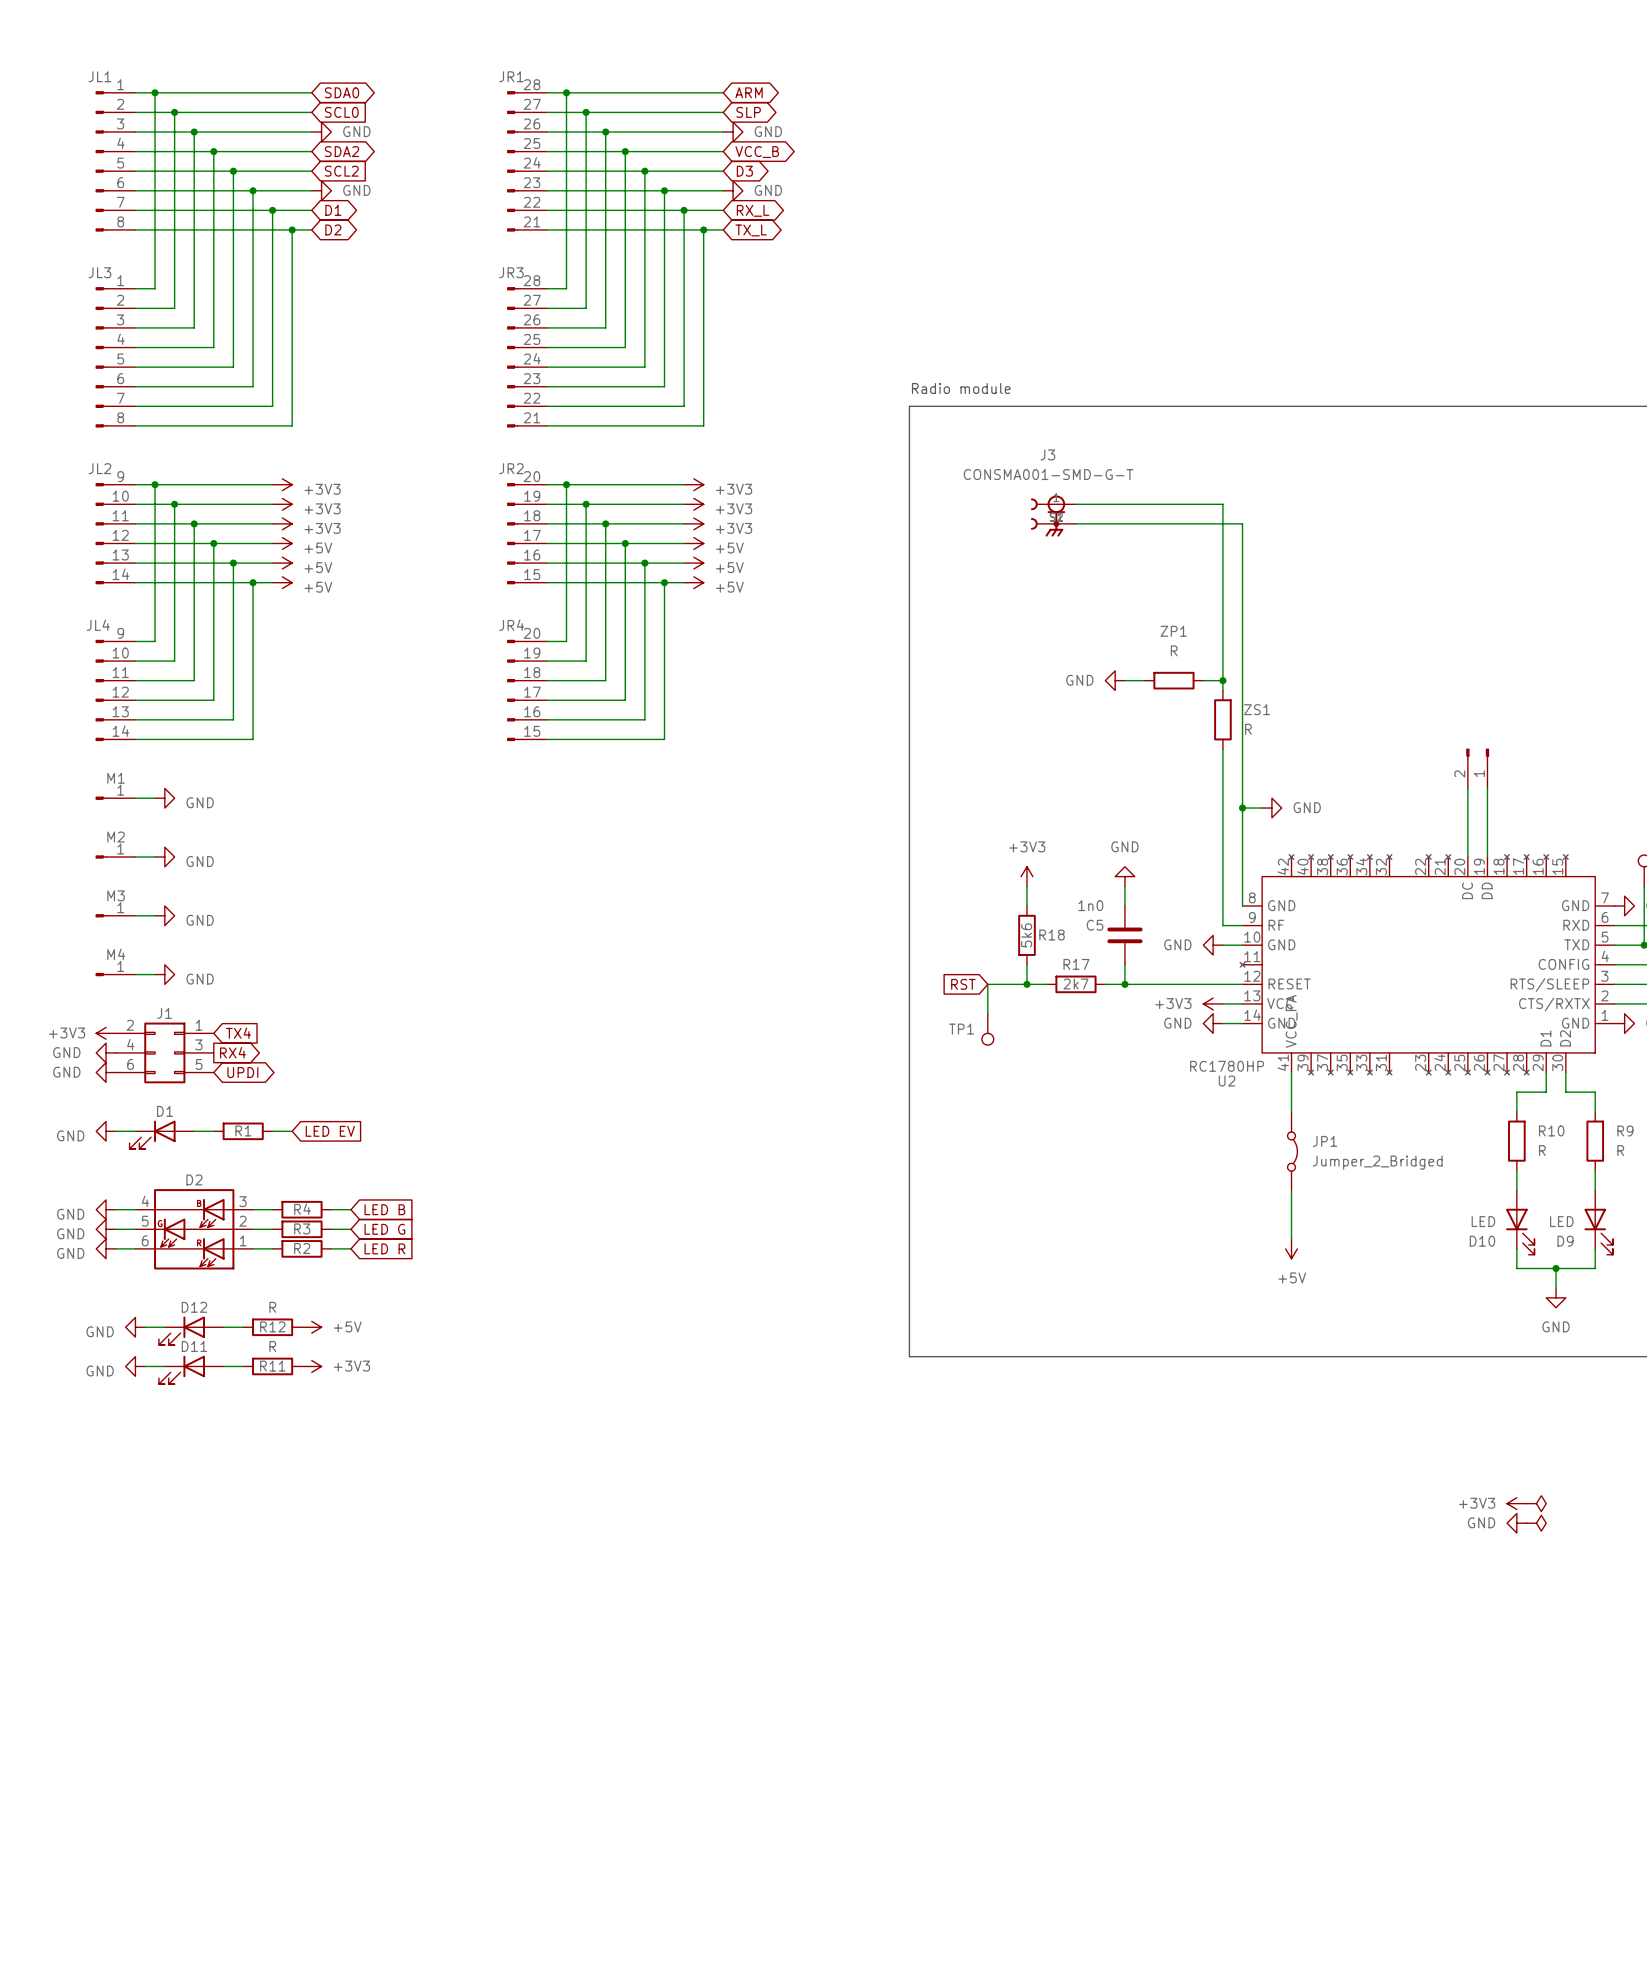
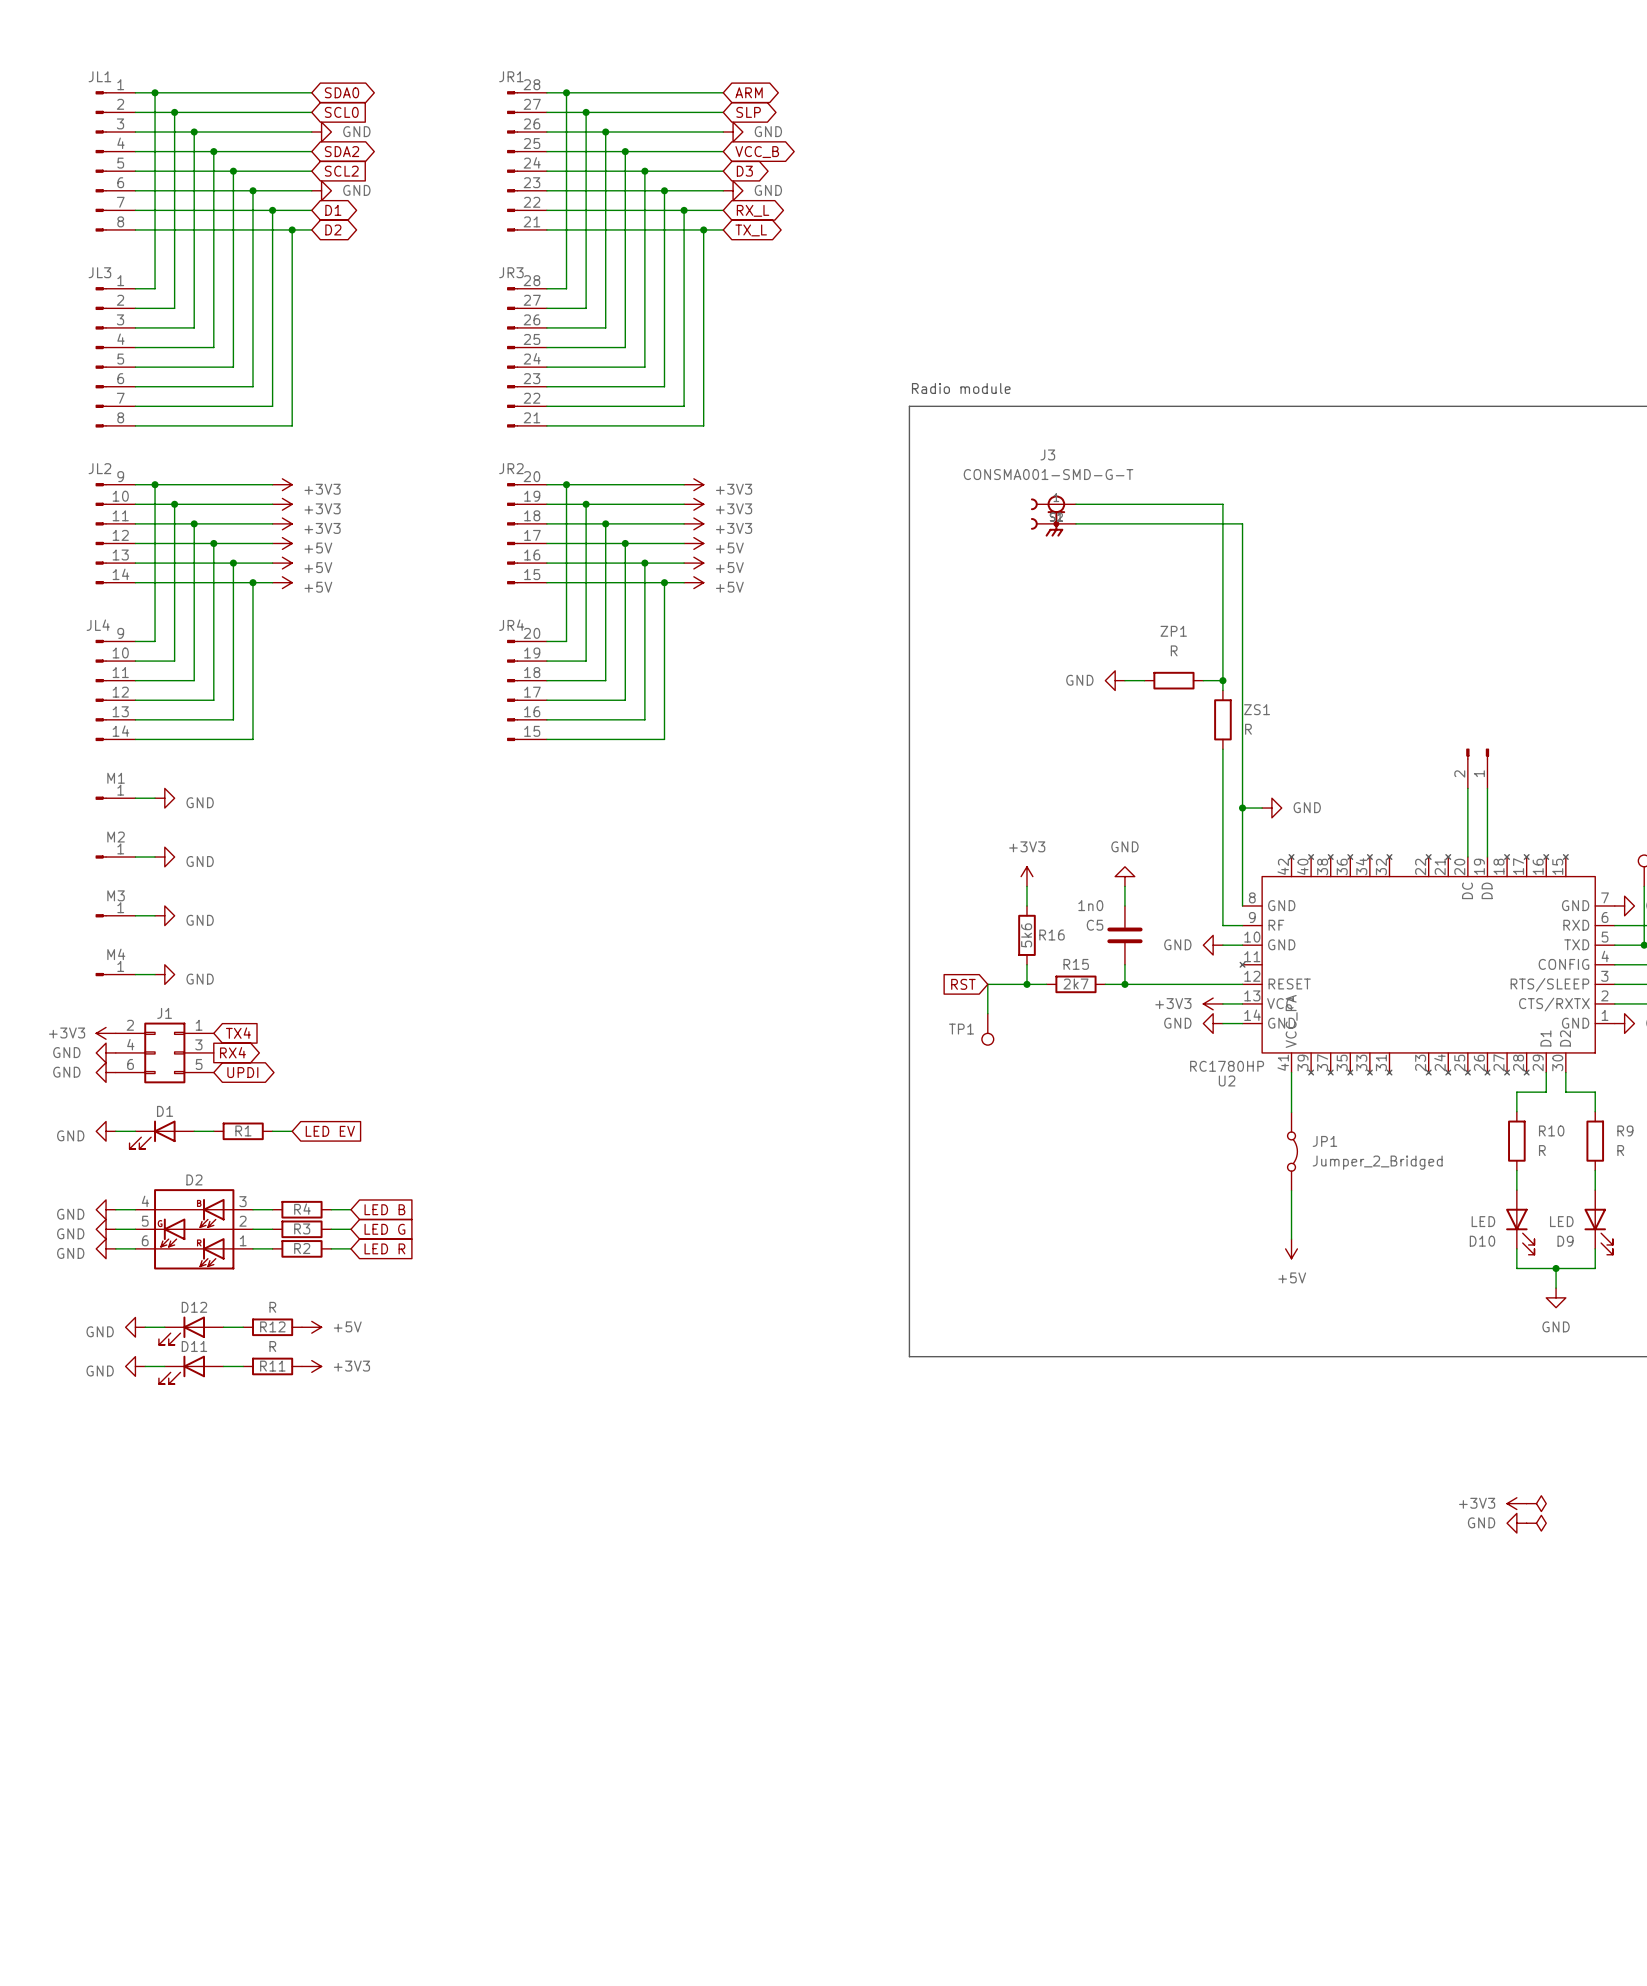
R18 name: R18 (1052, 935) -> R16 (1052, 935)
R17 name: R17 (1076, 964) -> R15 (1076, 964)

